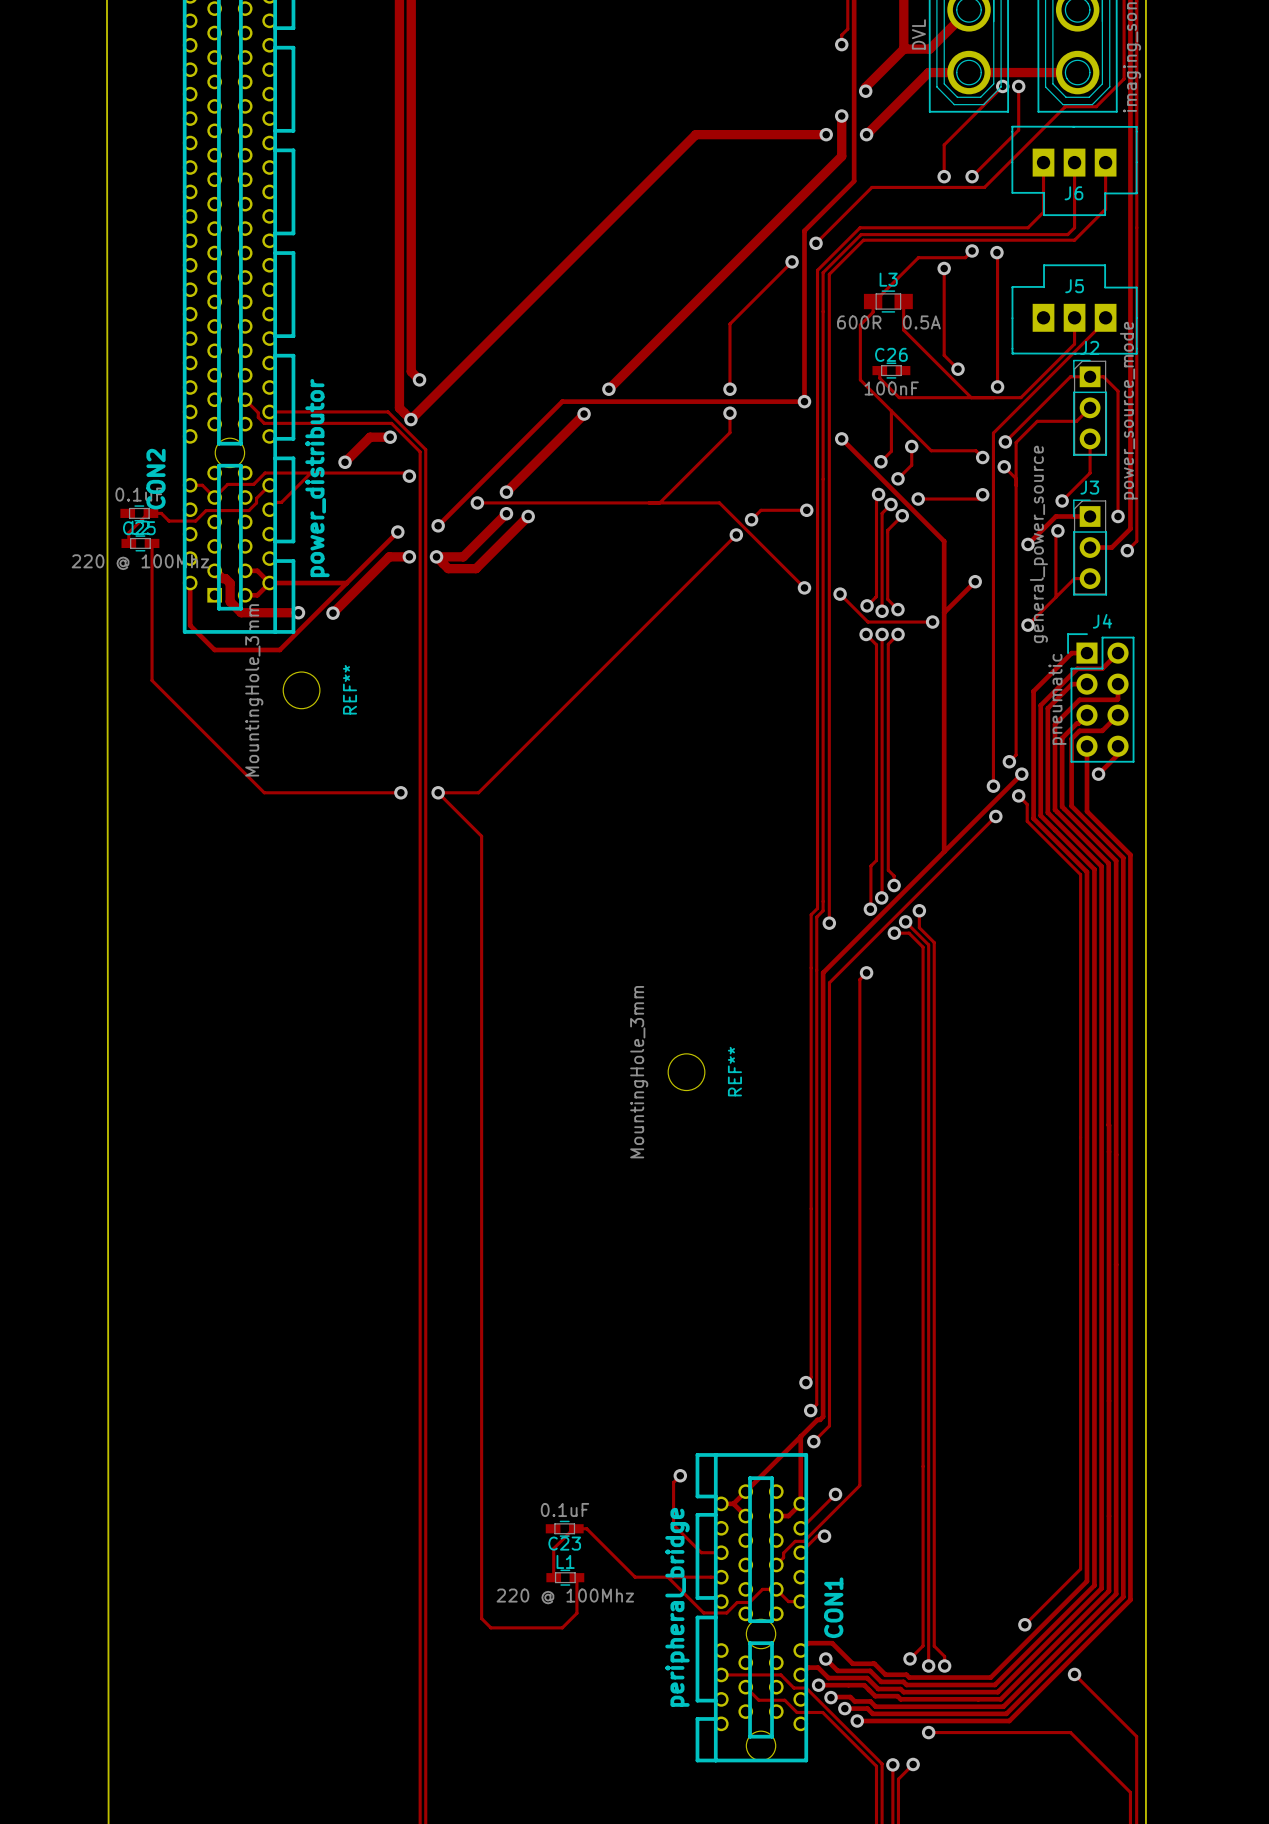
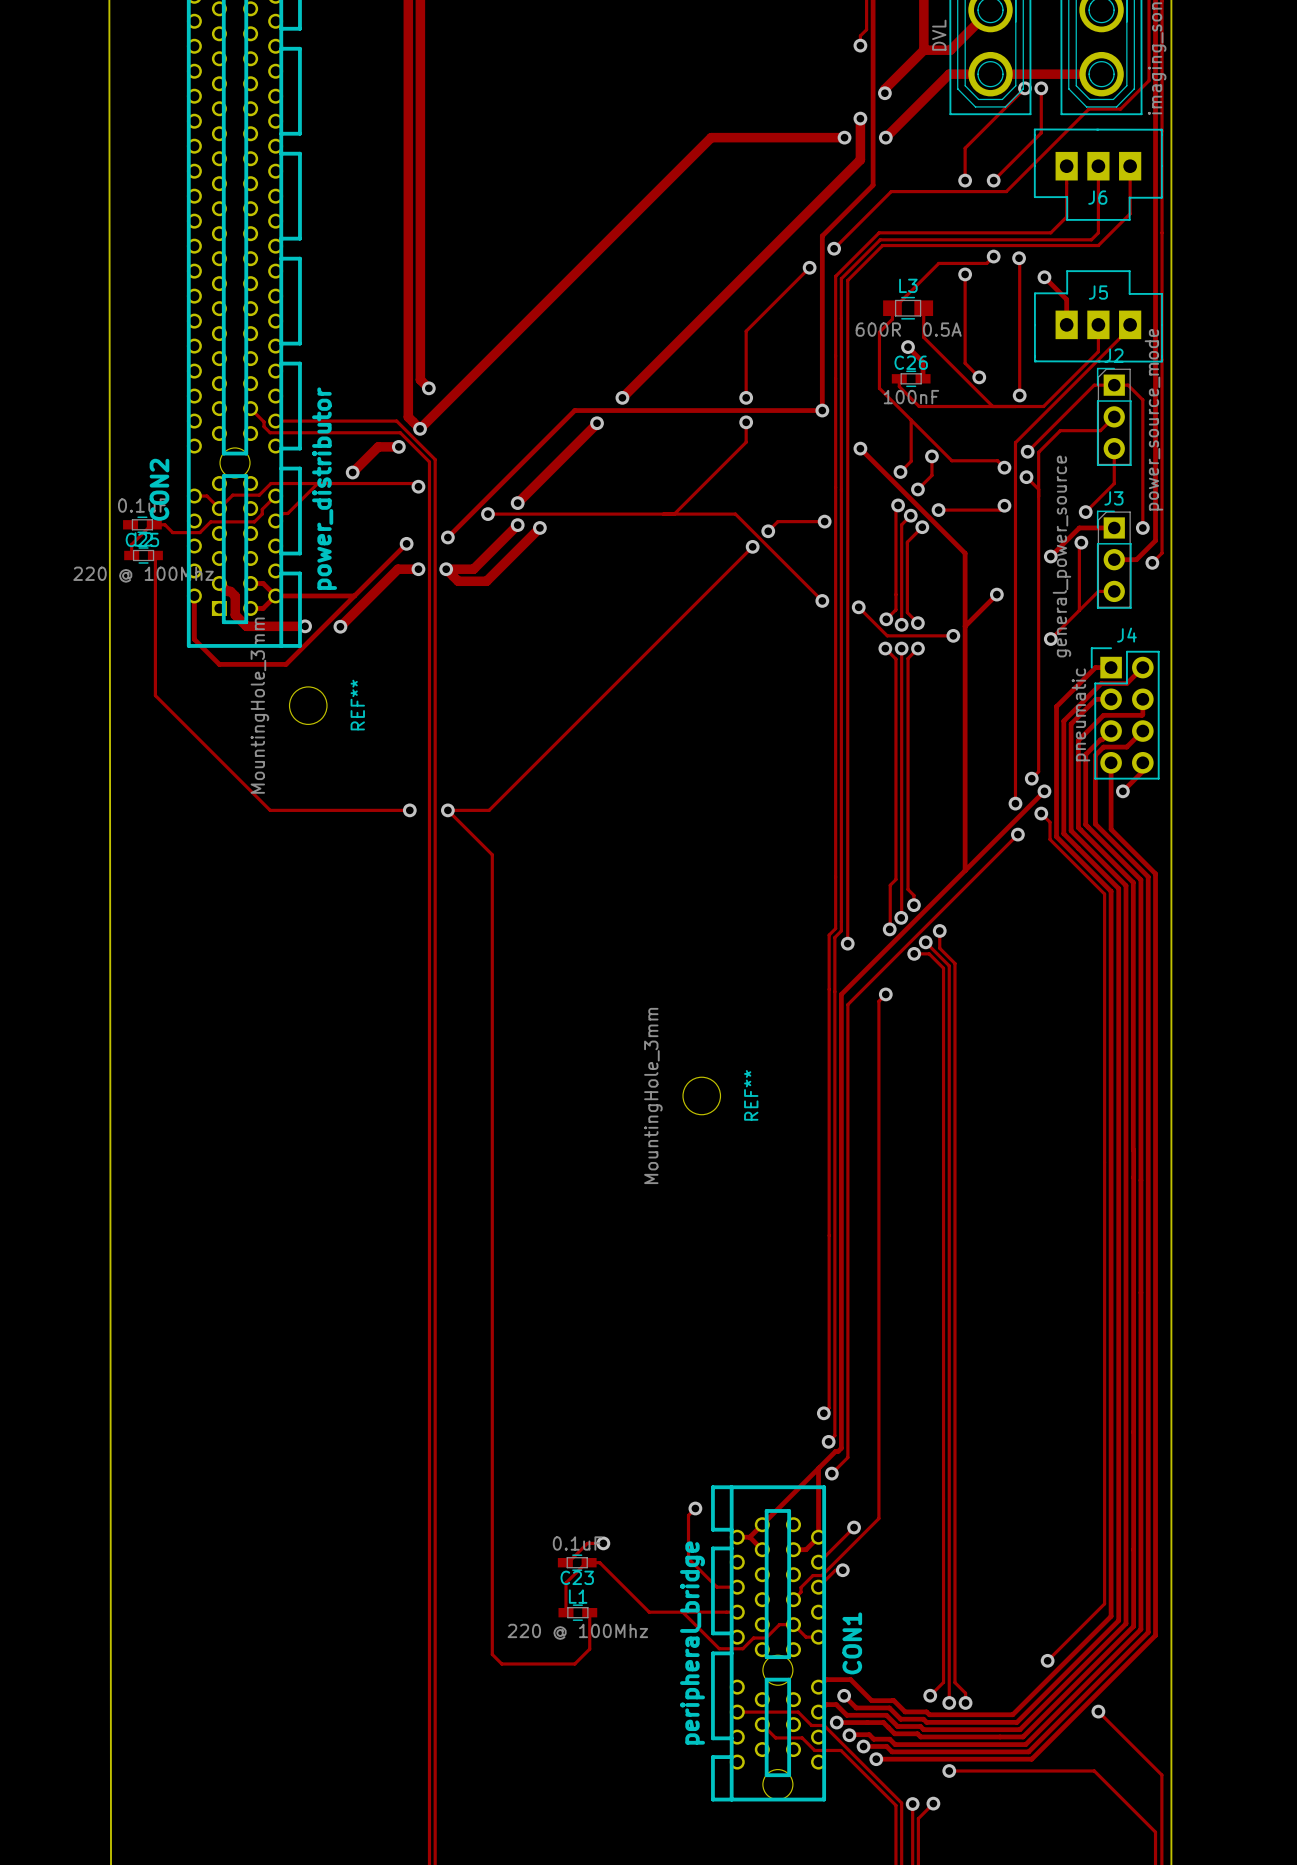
track: none -> (1044, 277) (1066, 299) (1066, 324)
via: none -> (1044, 277)
track: none -> (908, 347) (923, 362) (923, 378)
via: none -> (908, 347)
track: none -> (603, 1543) (587, 1543) (568, 1562) (565, 1562)
via: none -> (603, 1543)

